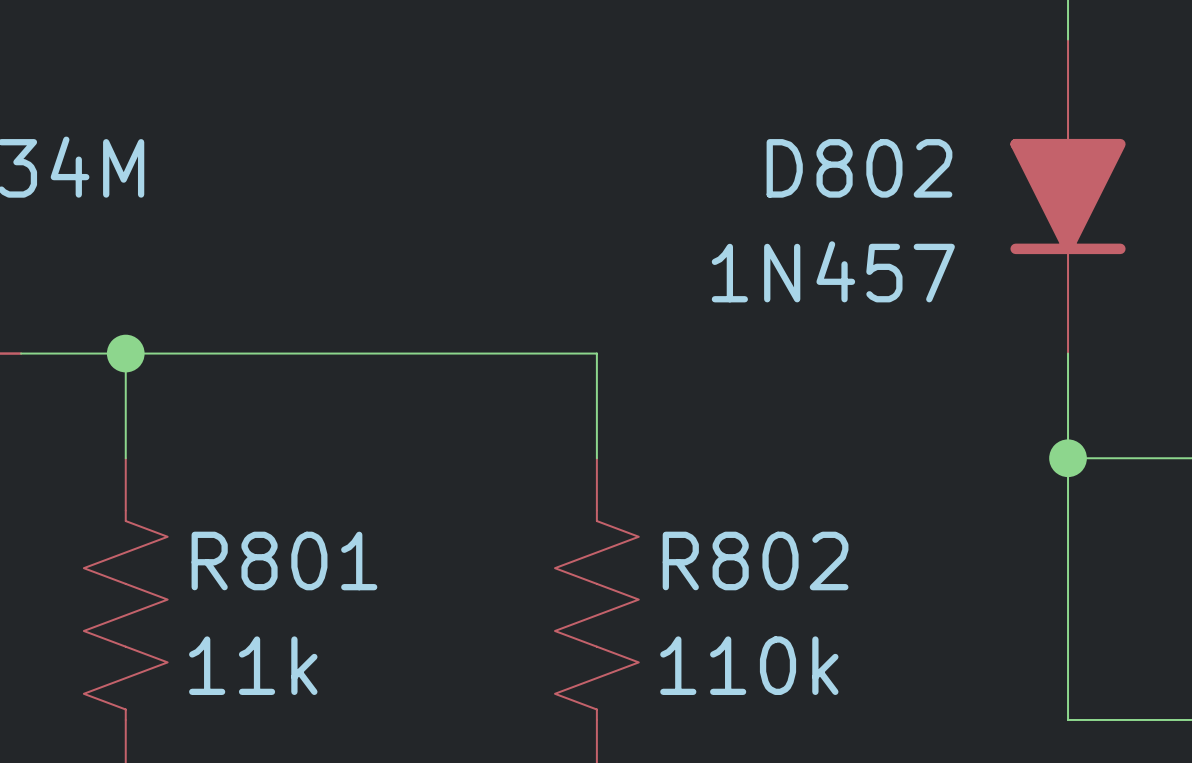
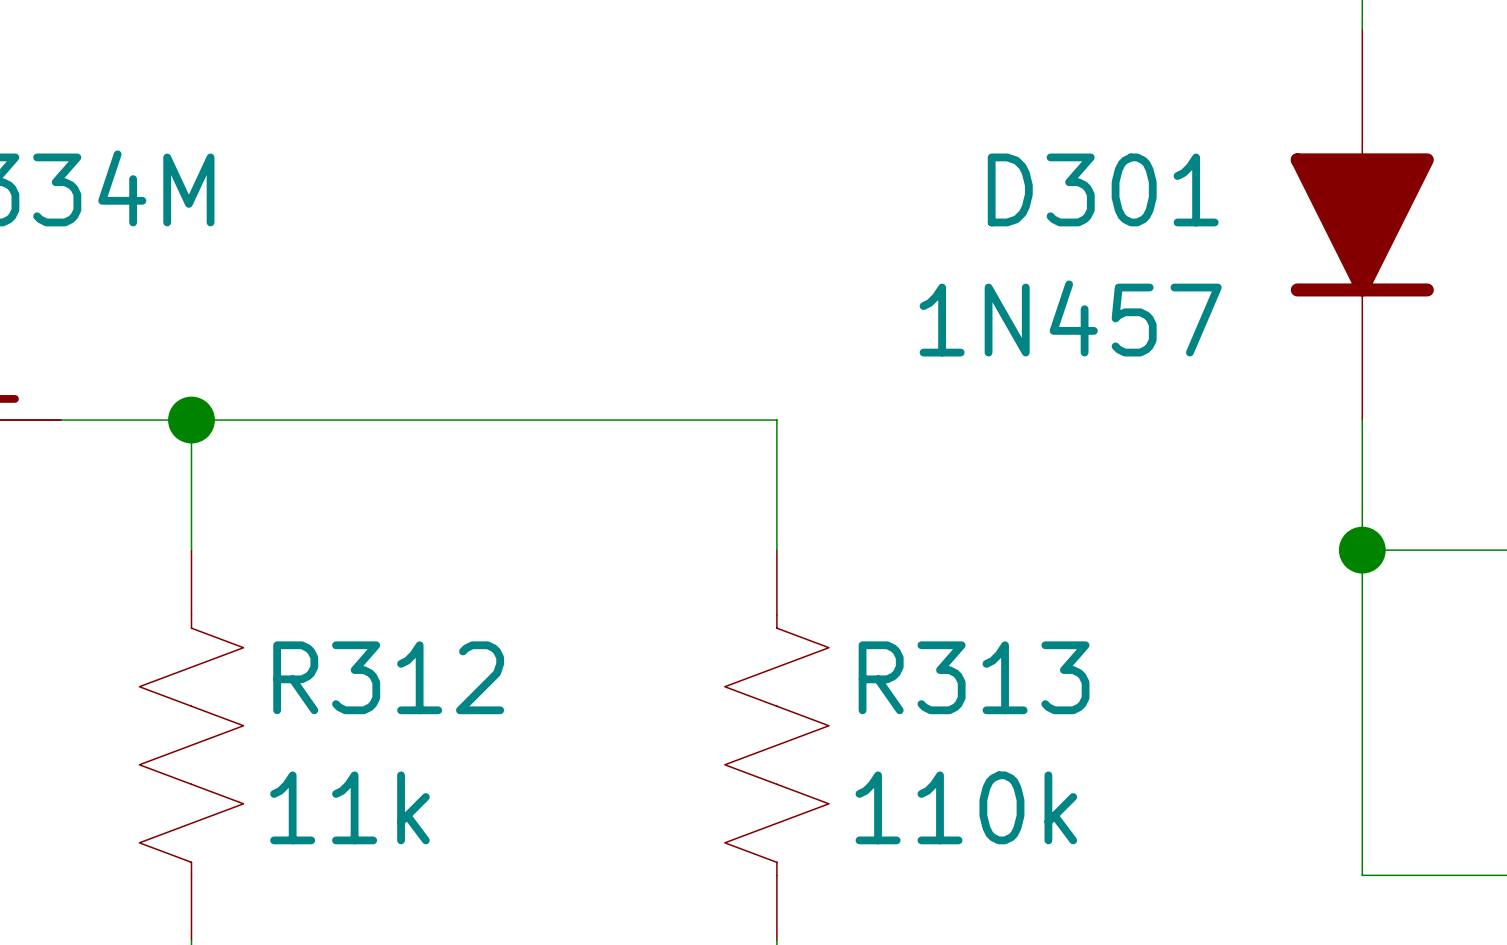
D802 name: D802 (859, 168) -> D301 (1103, 189)
R801 name: R801 (284, 560) -> R312 (388, 677)
R802 name: R802 (755, 560) -> R313 (974, 677)

